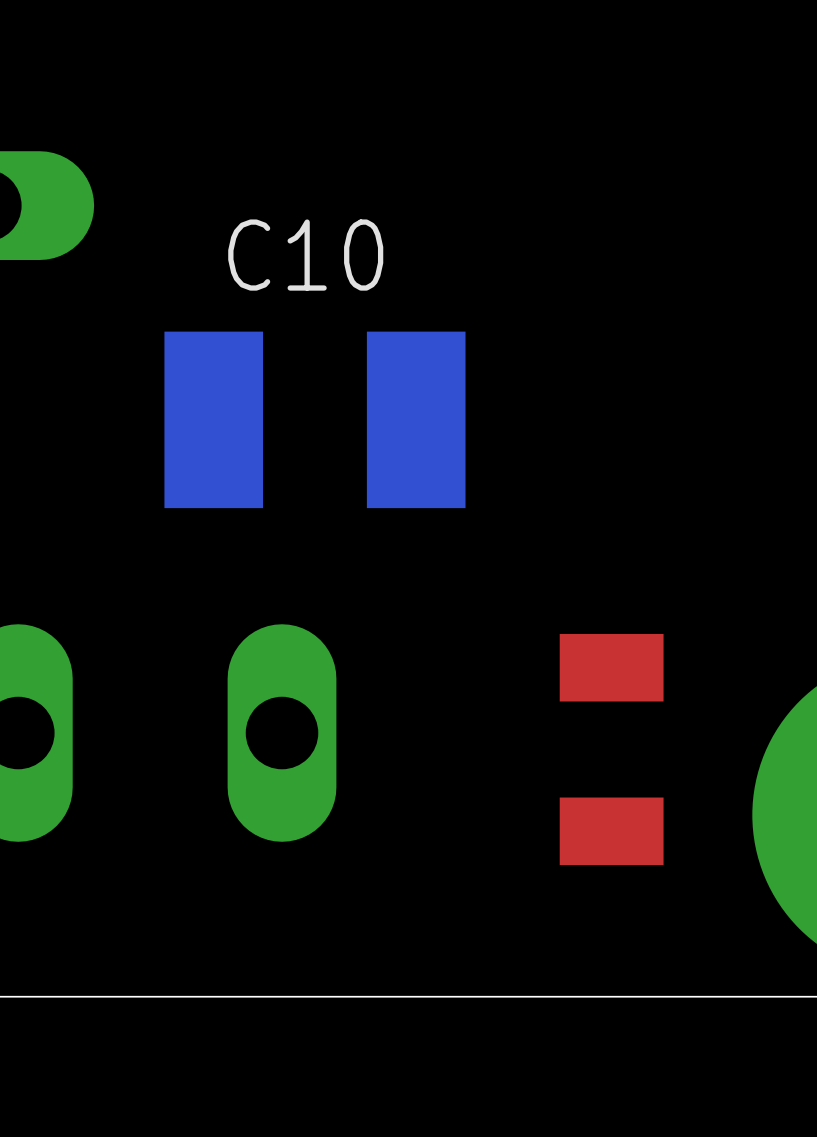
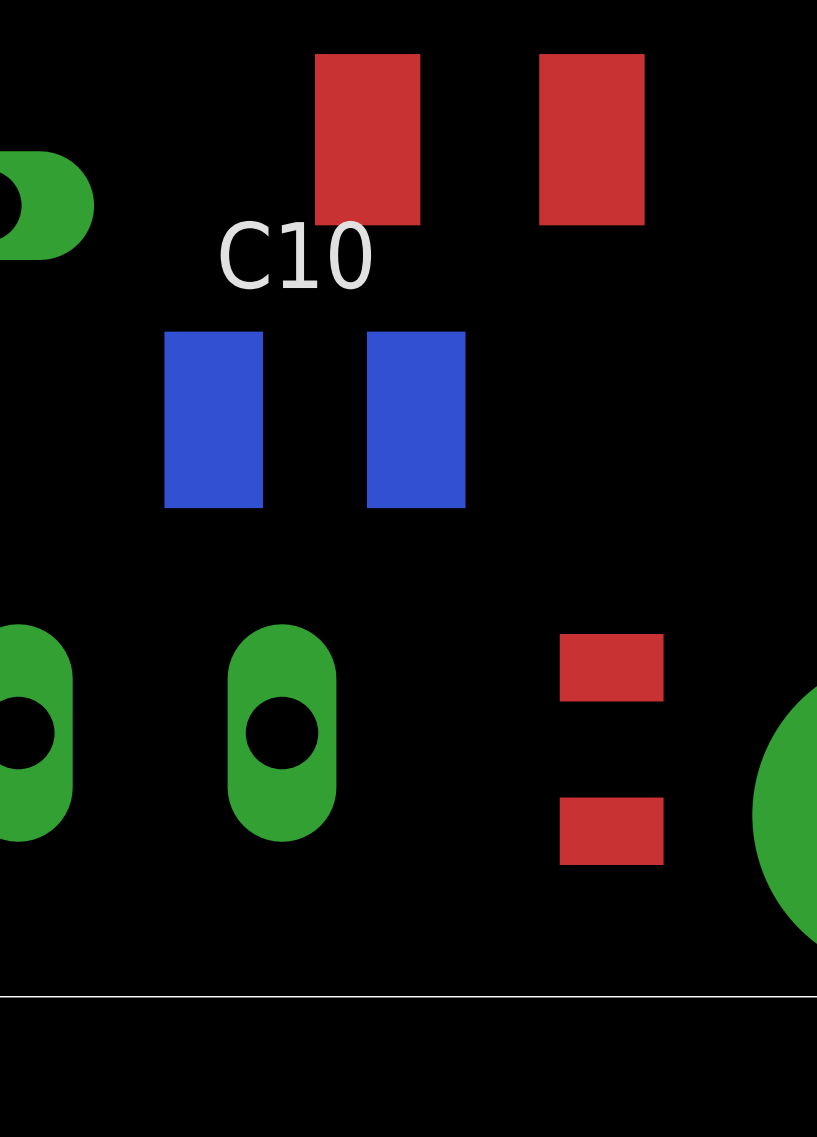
part: none -> (479, 139)

